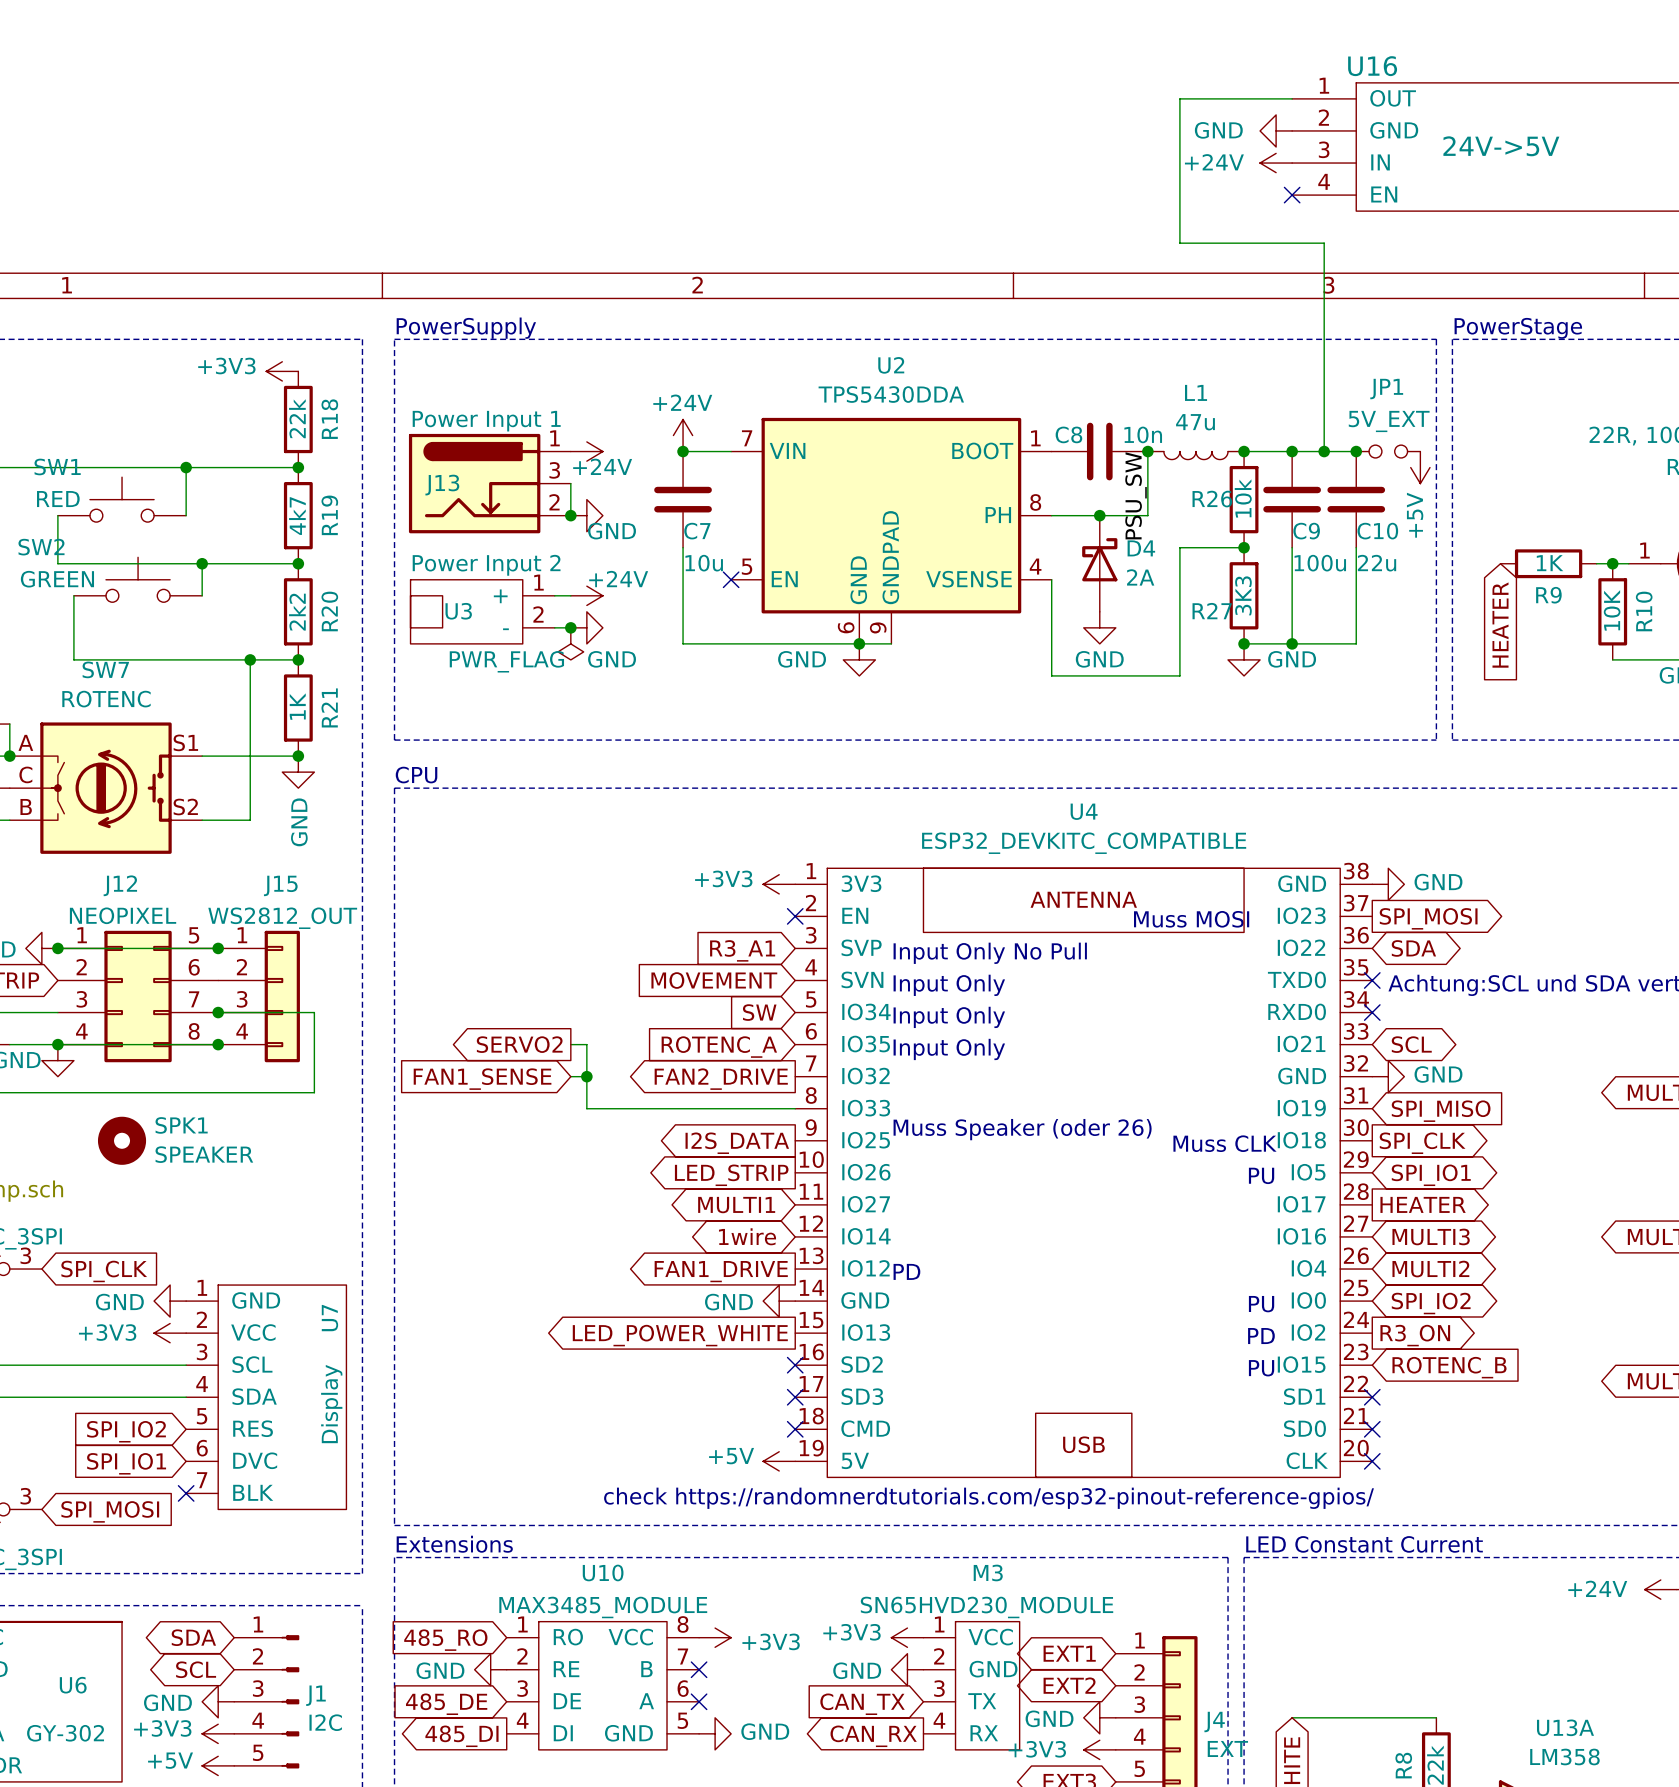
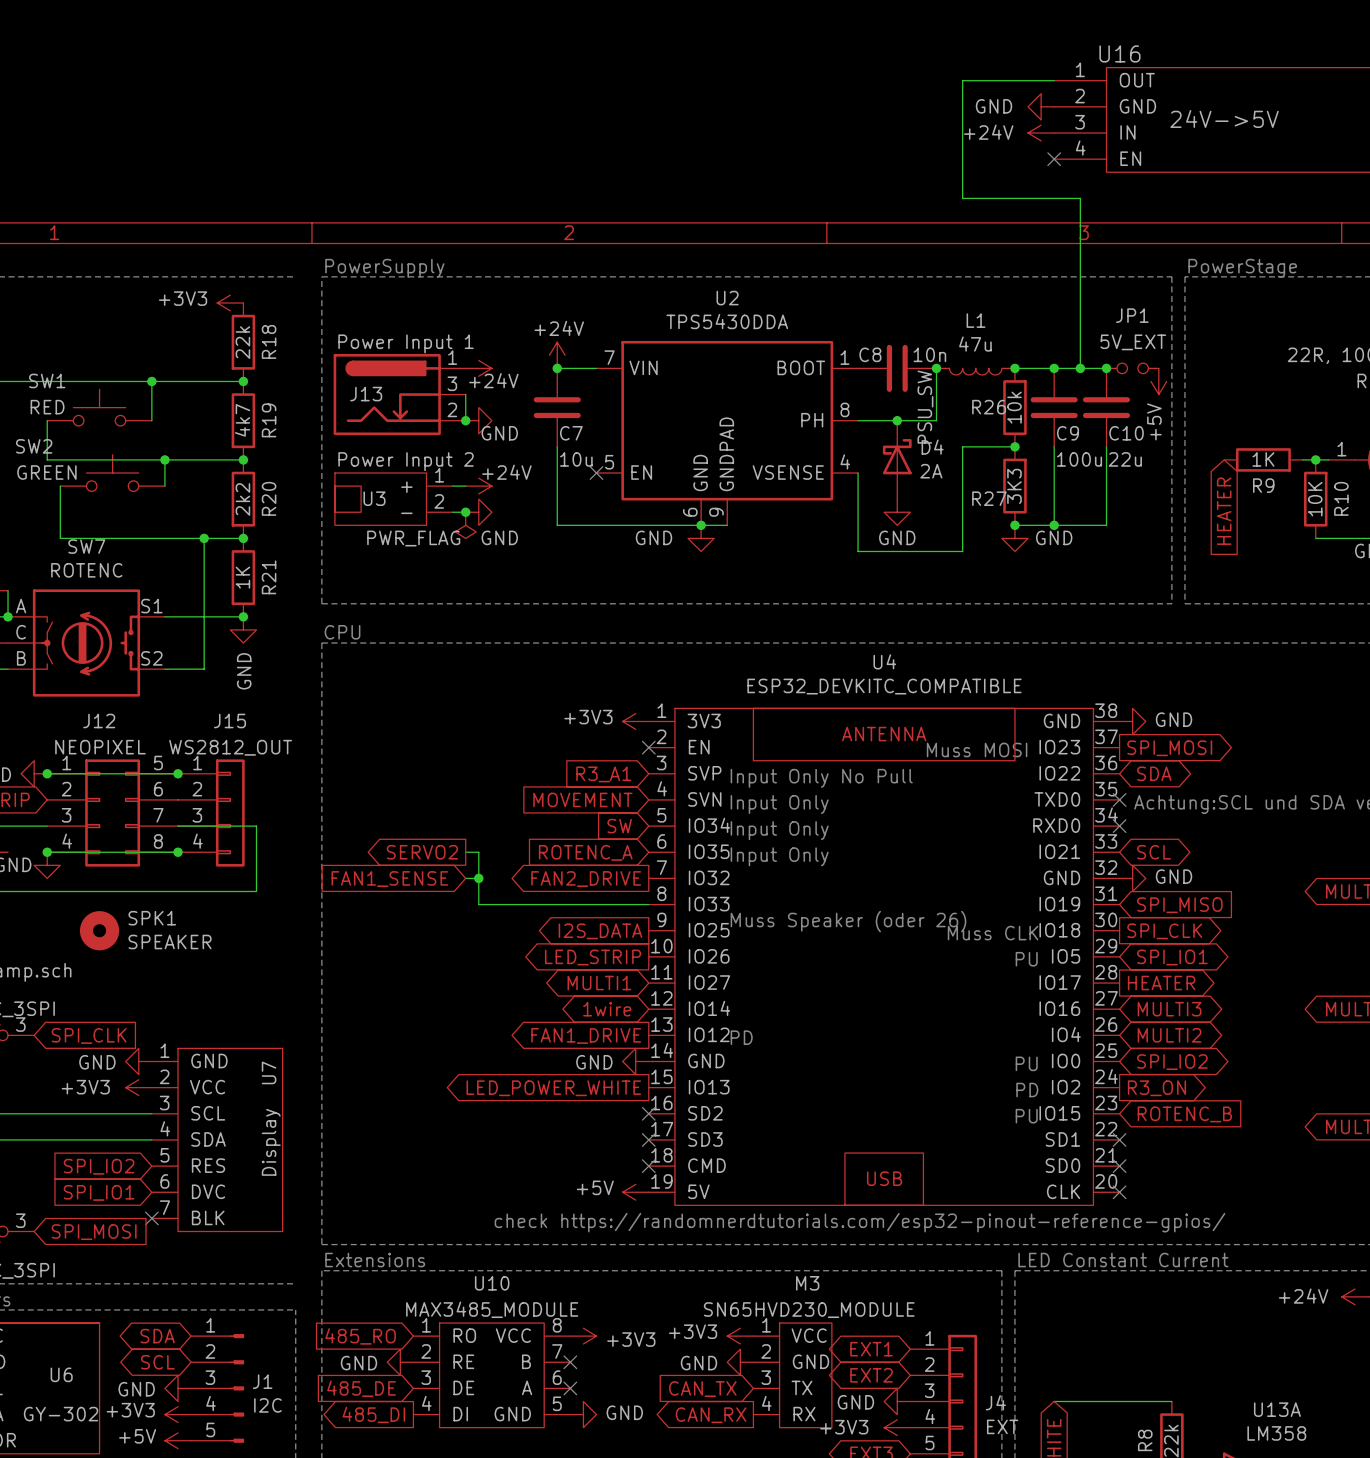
line: (362, 339) (362, 1573) -> none
junction: (218, 1012) -> none
wire: (9, 1044) (57, 1044) -> none

